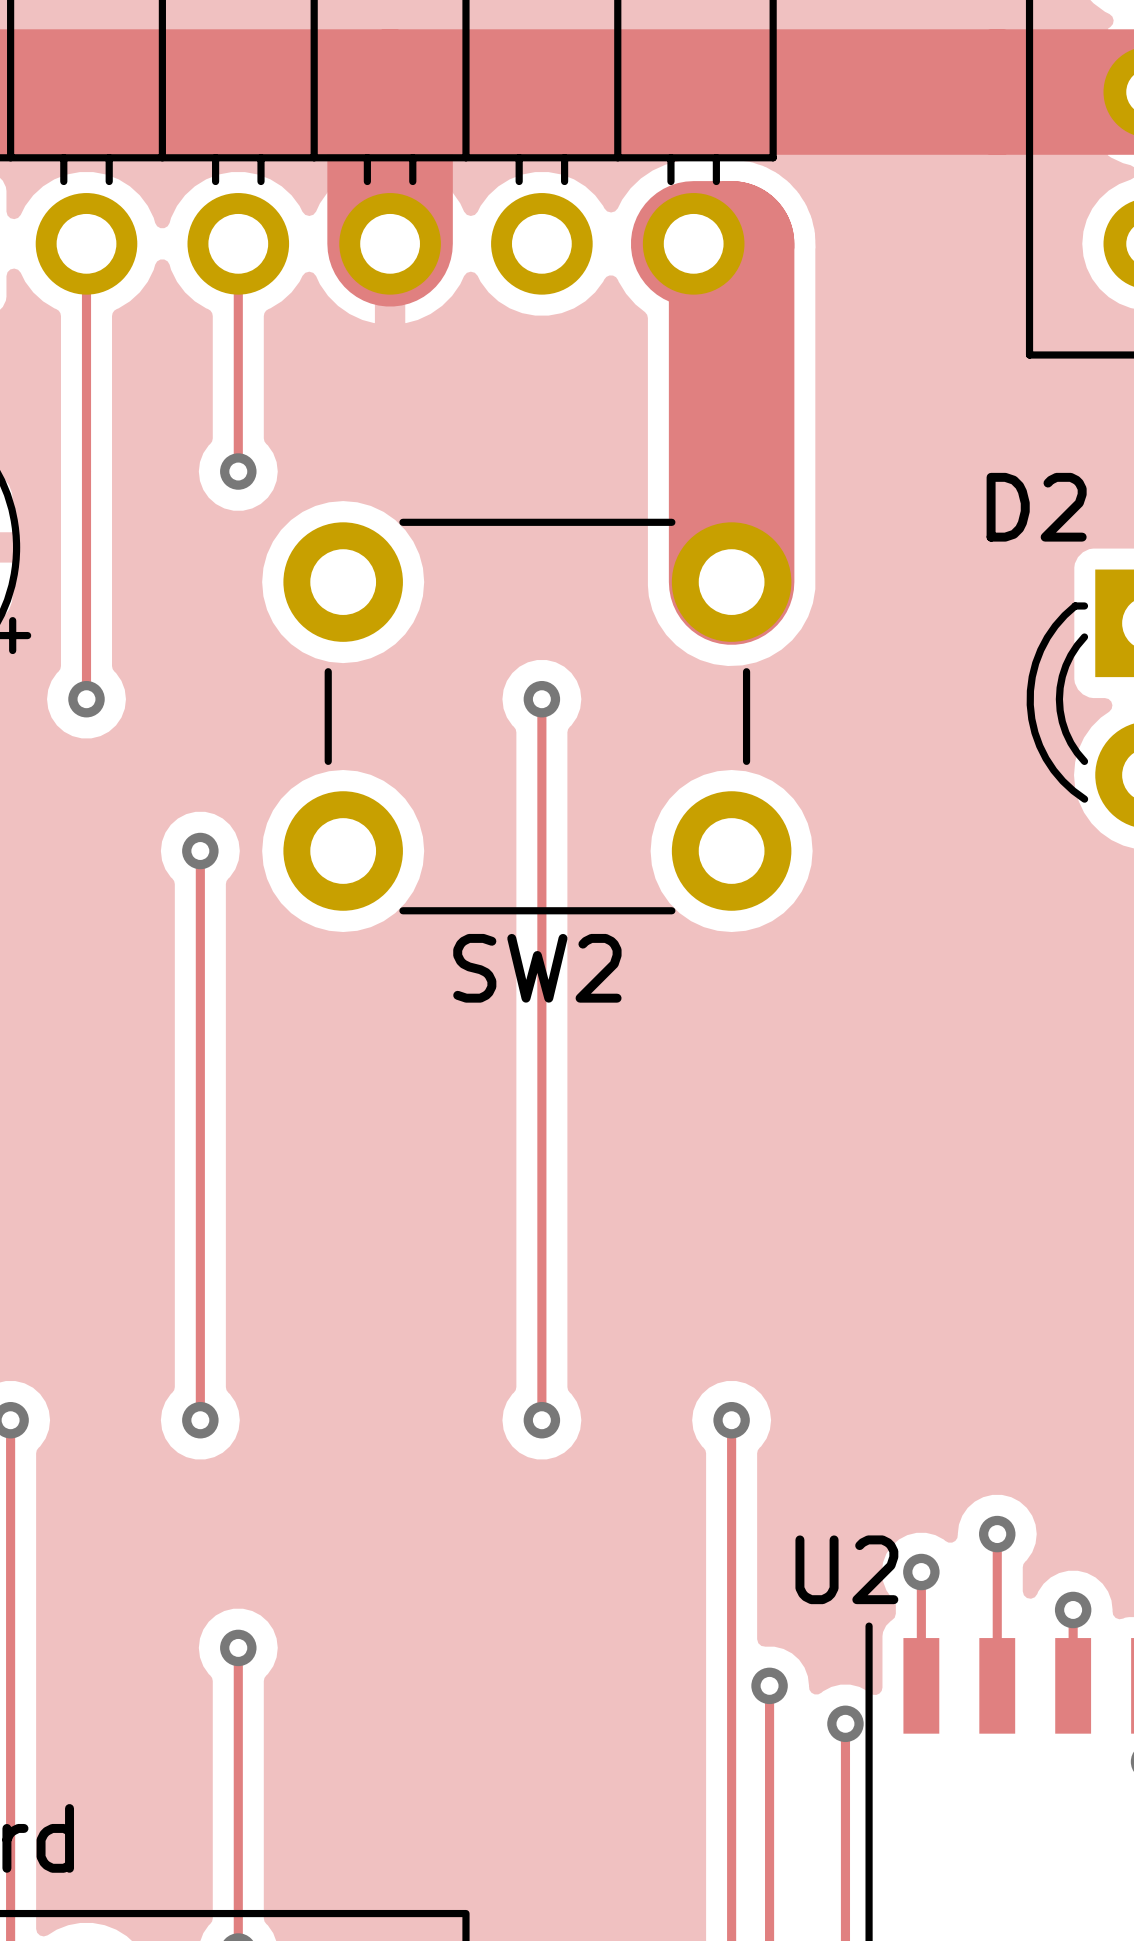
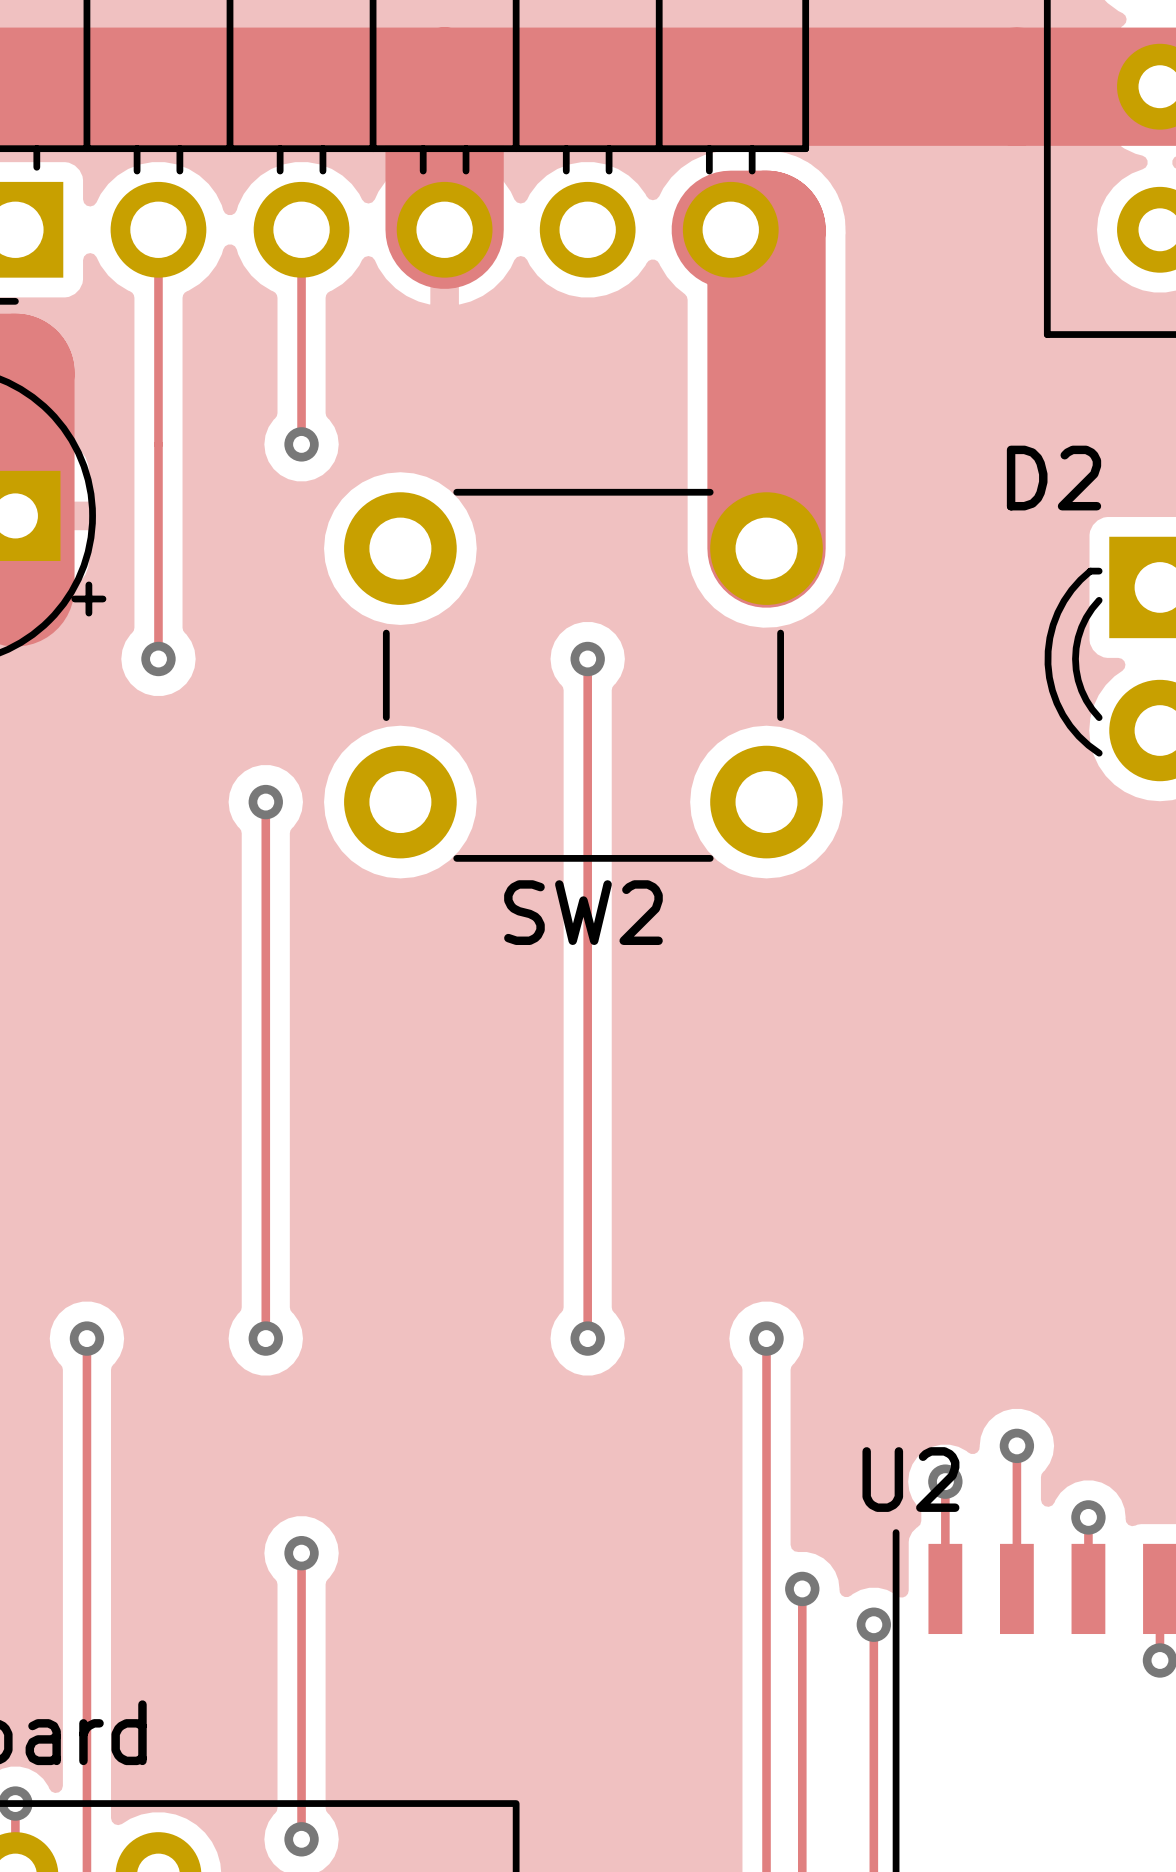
U2 name position: U2 (846, 1569) -> U2 (910, 1479)

